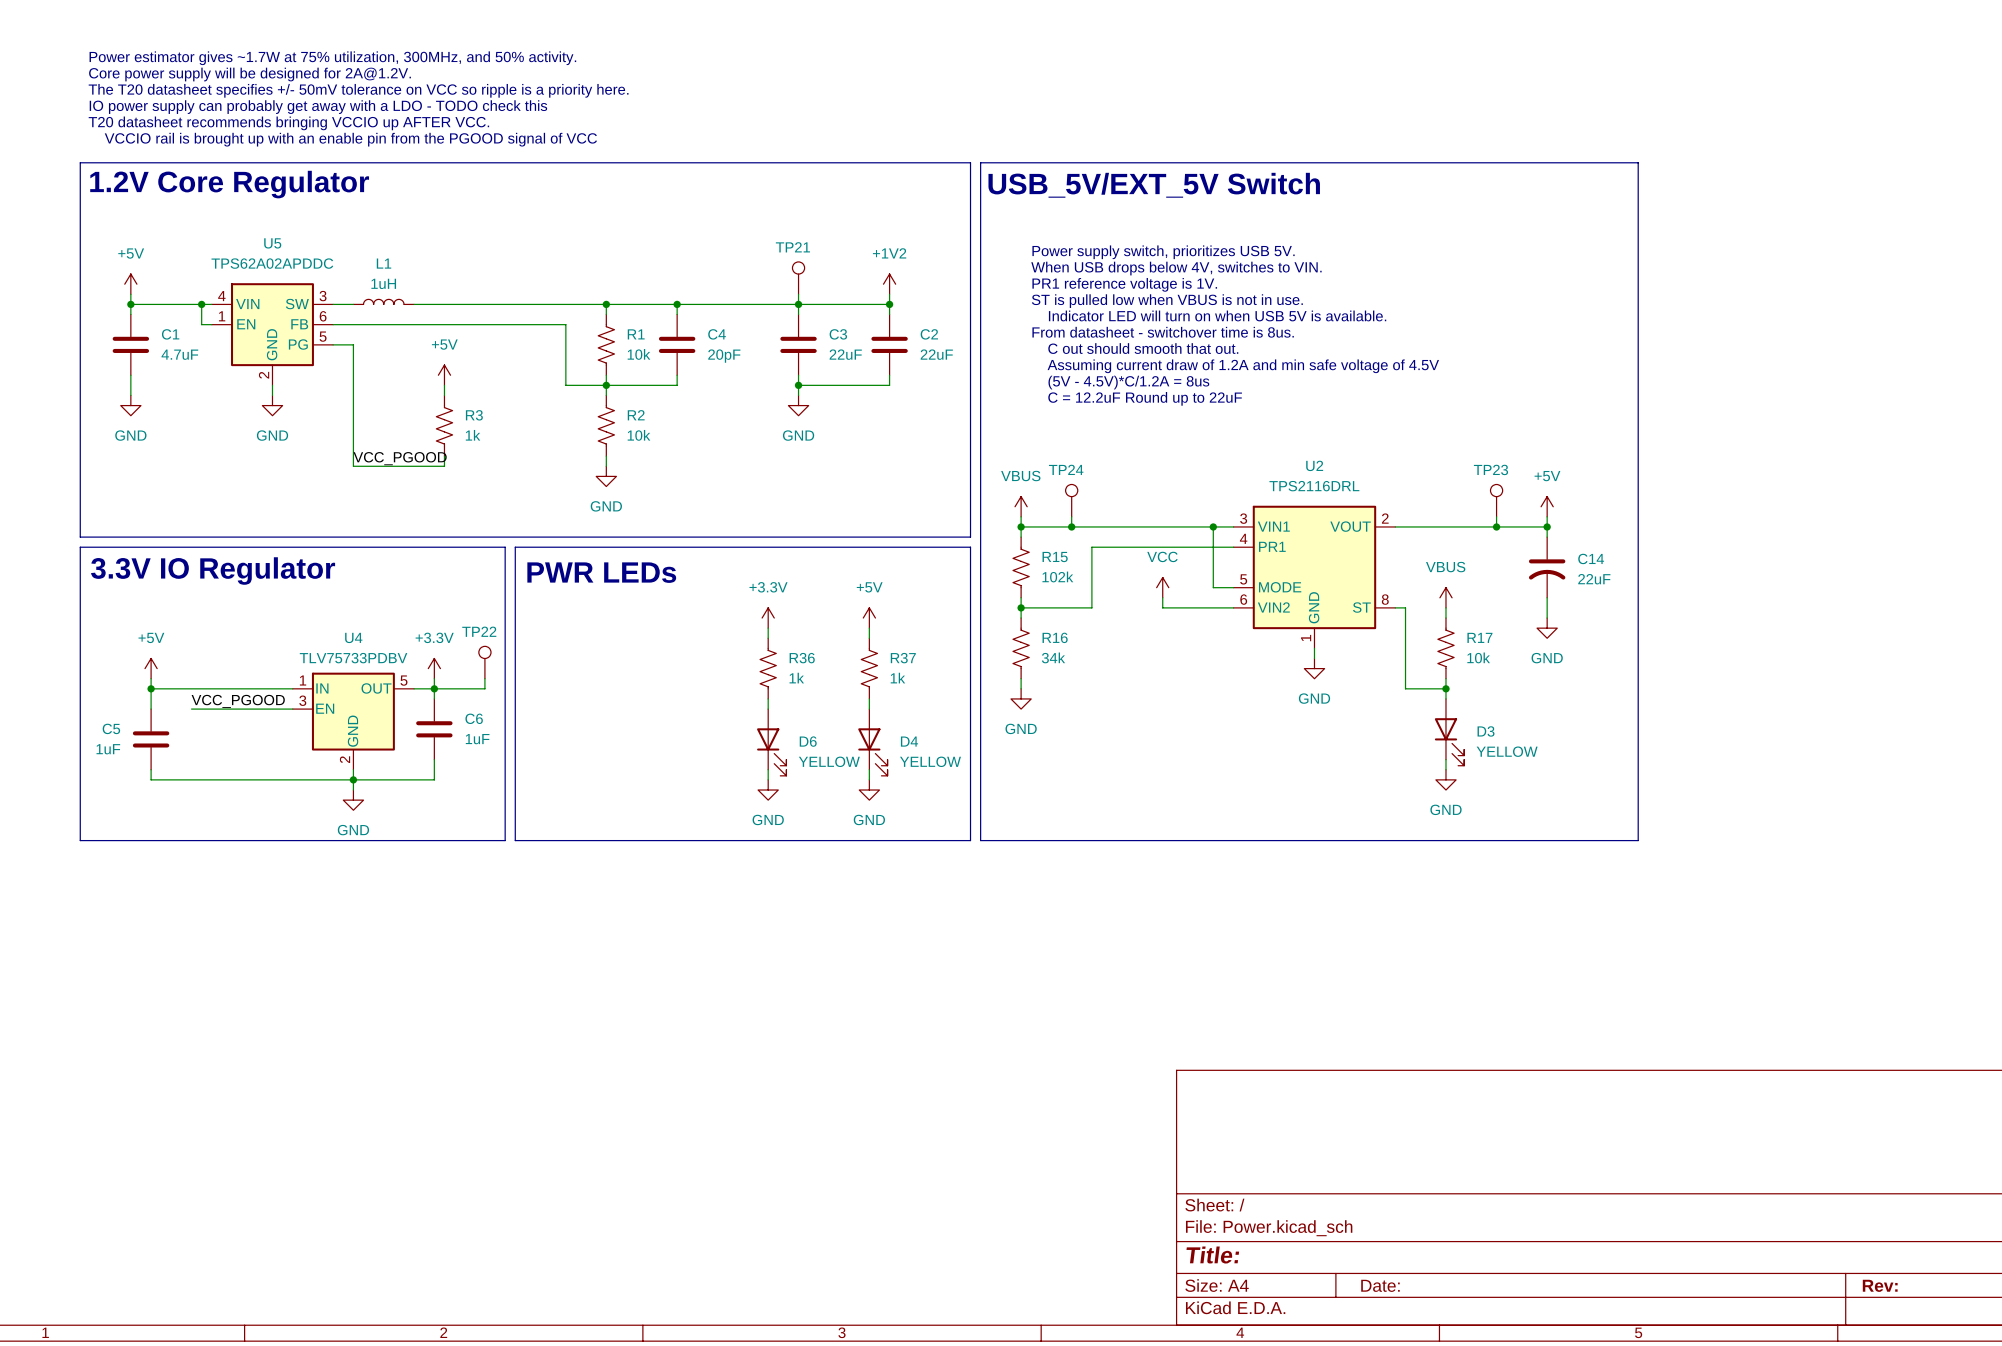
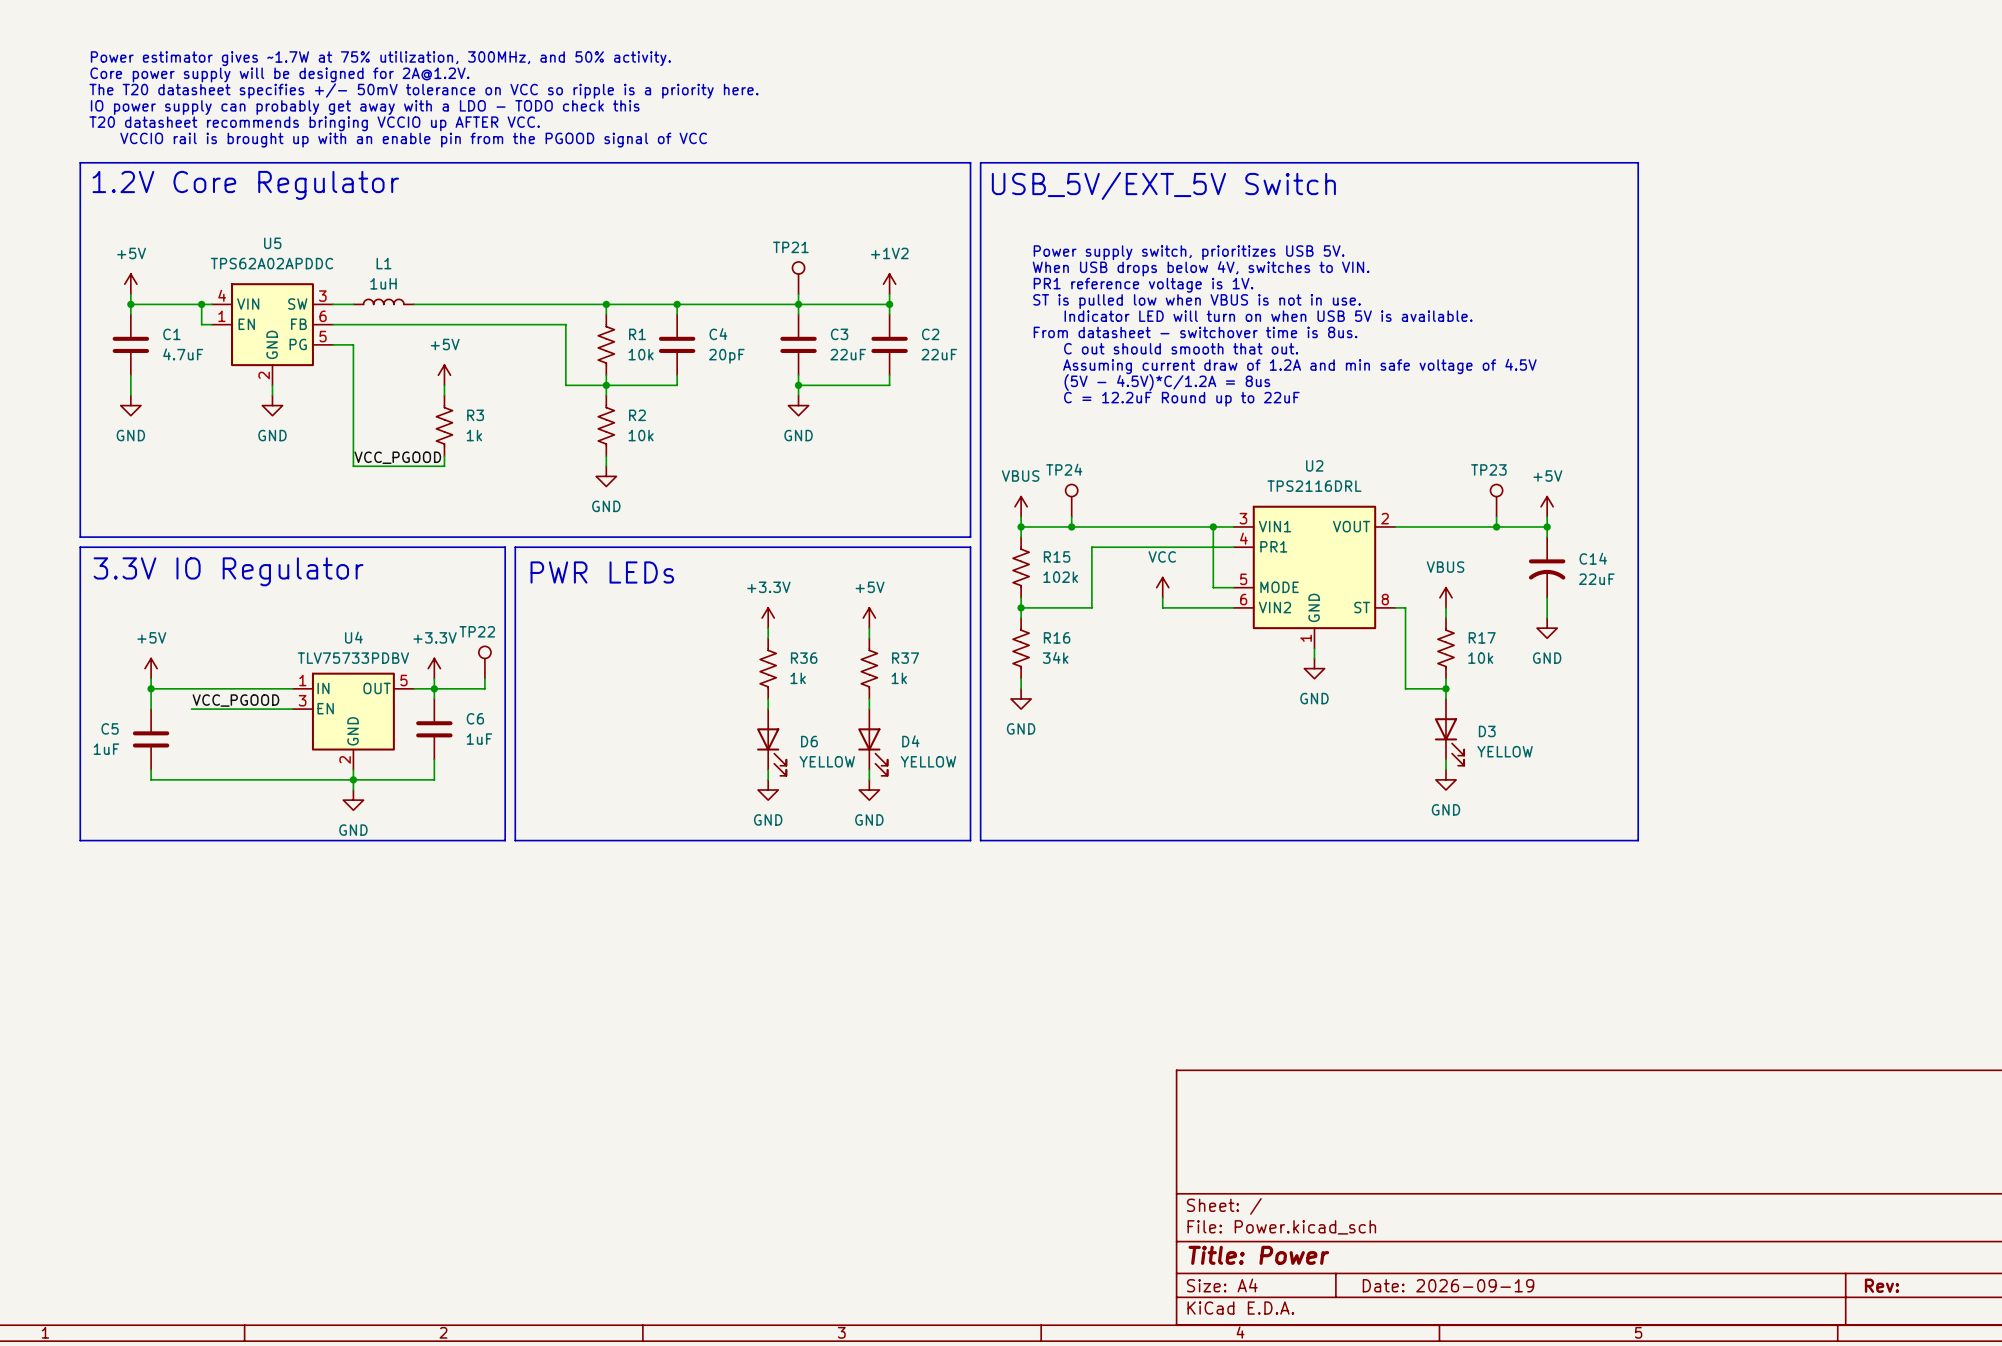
title block: Title: (1212, 1255) -> Title: Power (1258, 1255)
title block: Date: (1380, 1285) -> Date: 2026-09-19 (1448, 1285)

